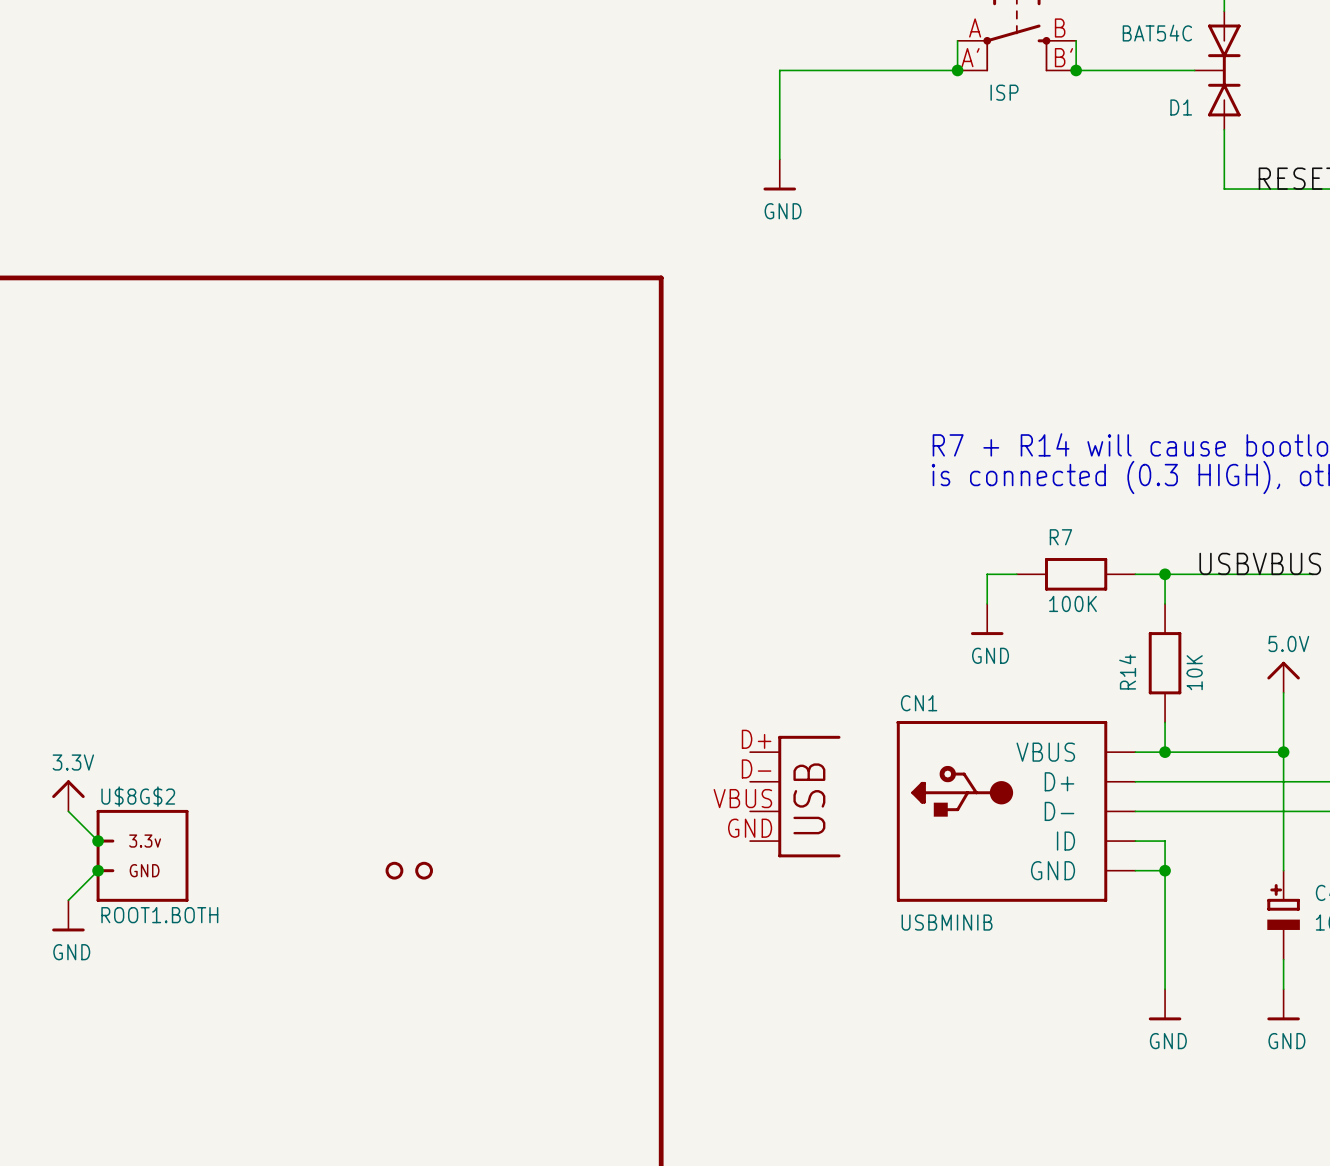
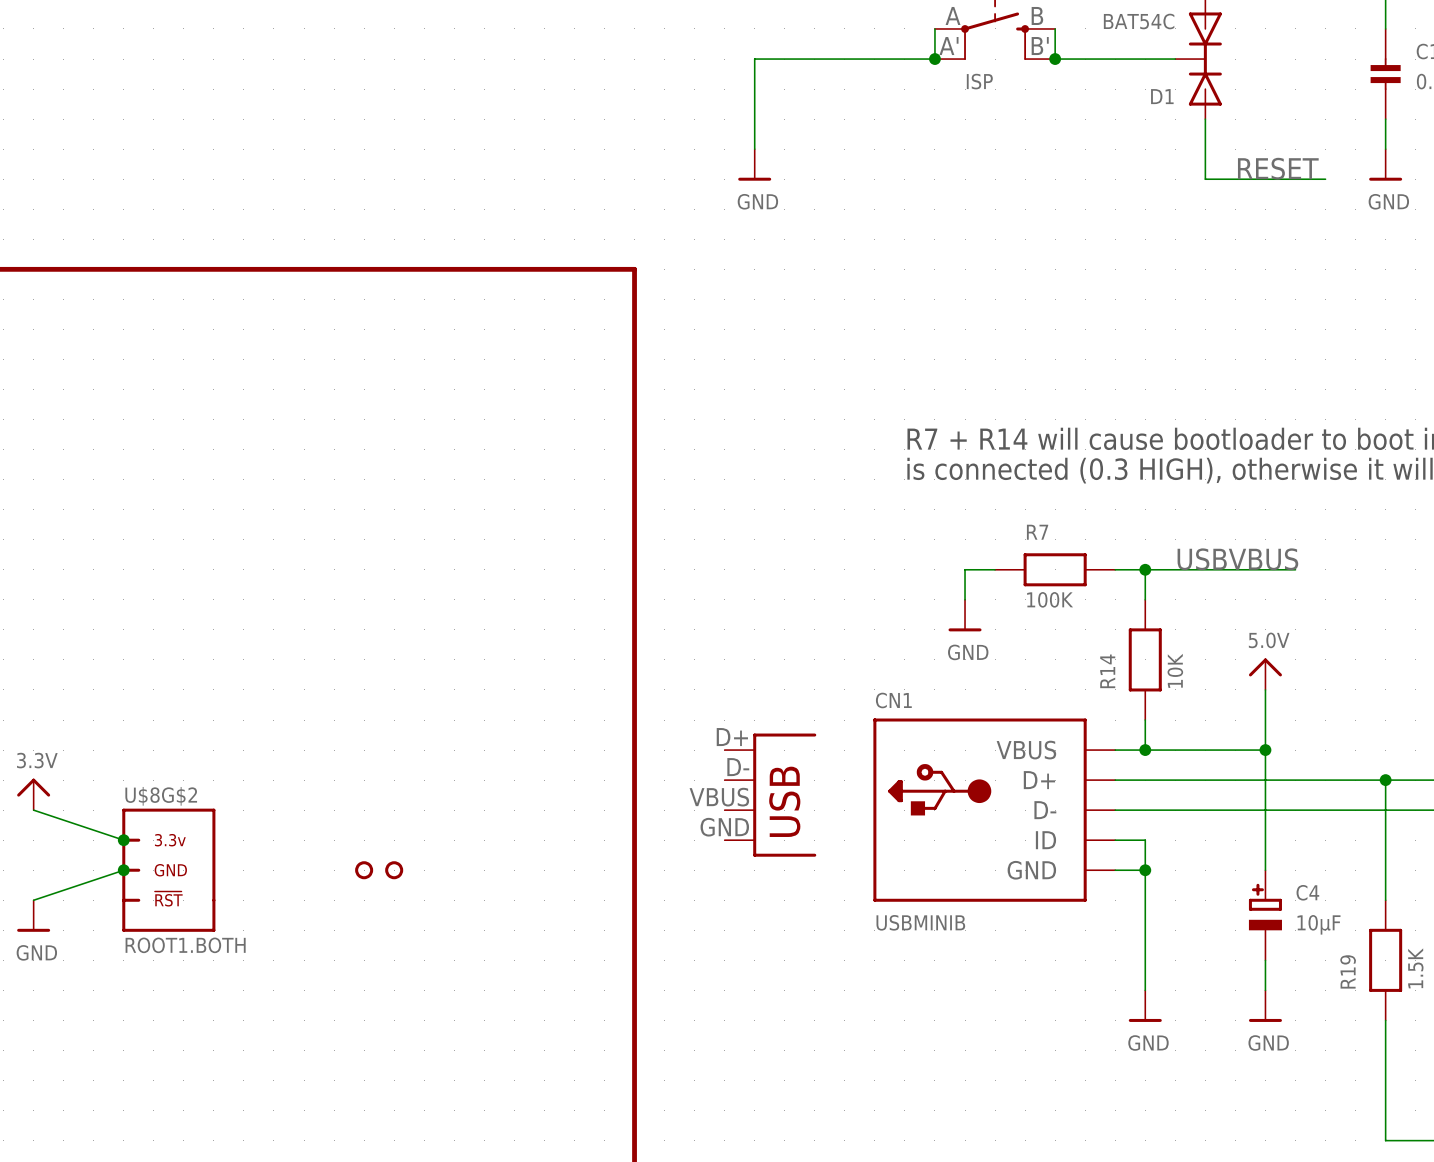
U$8G$2 symbol: [96, 809, 189, 902] -> [122, 808, 216, 932]
wire: (68, 811) (98, 841) -> (33, 810) (123, 840)
junction: (98, 841) -> none
junction: none -> (123, 840)
wire: (98, 870) (68, 900) -> (123, 870) (33, 900)
junction: (98, 870) -> none
junction: none -> (123, 870)

